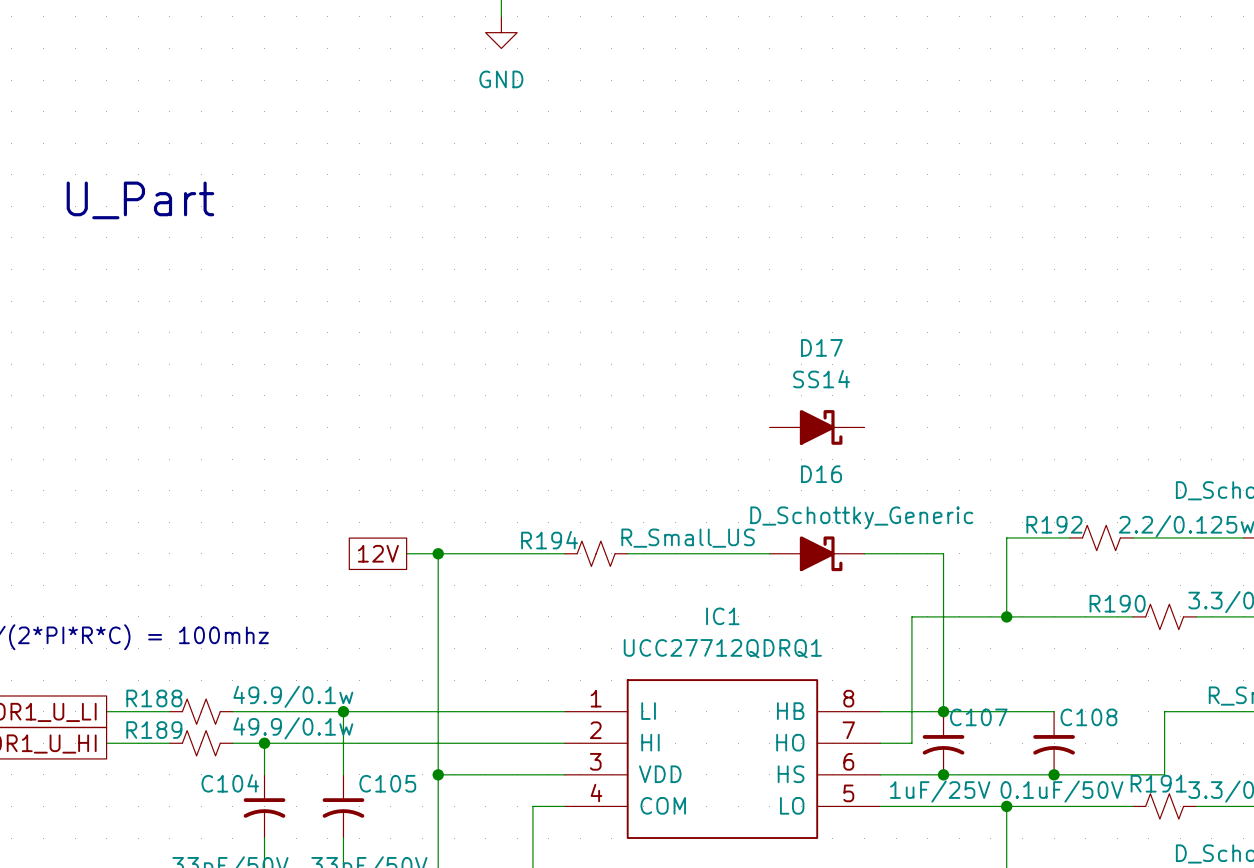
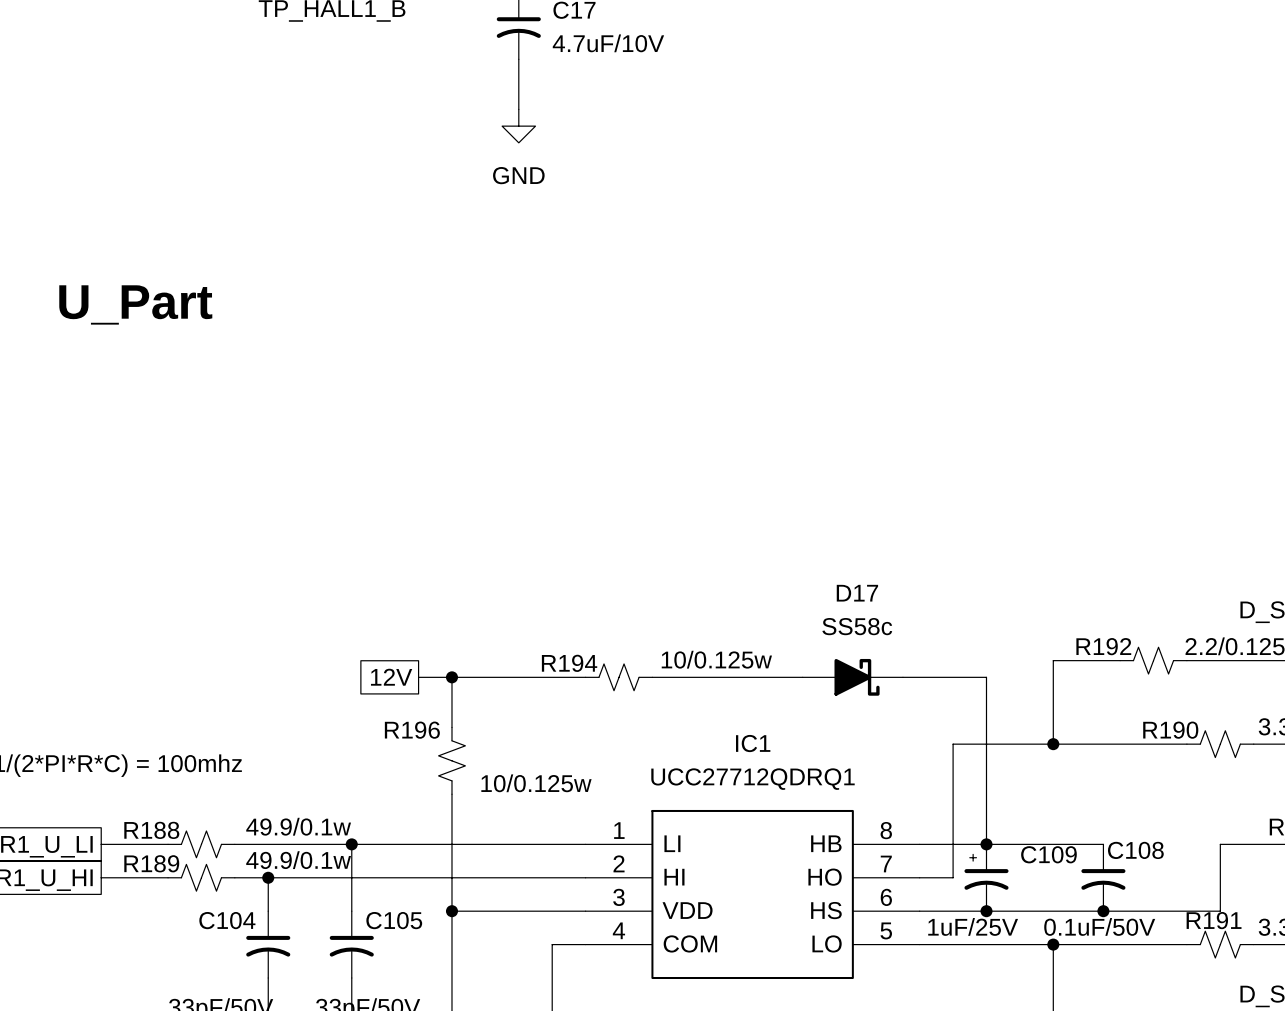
D17: SS14 (817, 427) -> none
D16 name: D16 (821, 474) -> D17 (857, 593)
D16 value: D_Schottky_Generic (861, 517) -> SS58c (857, 626)
R194 value: R_Small_US (688, 538) -> 10/0.125w (716, 659)
wire: (438, 601) (438, 664) -> none
R196: none -> 10/0.125w (451, 760)
C107: 1uF/25V (943, 743) -> none
C109: none -> 1uF/25V (986, 877)

